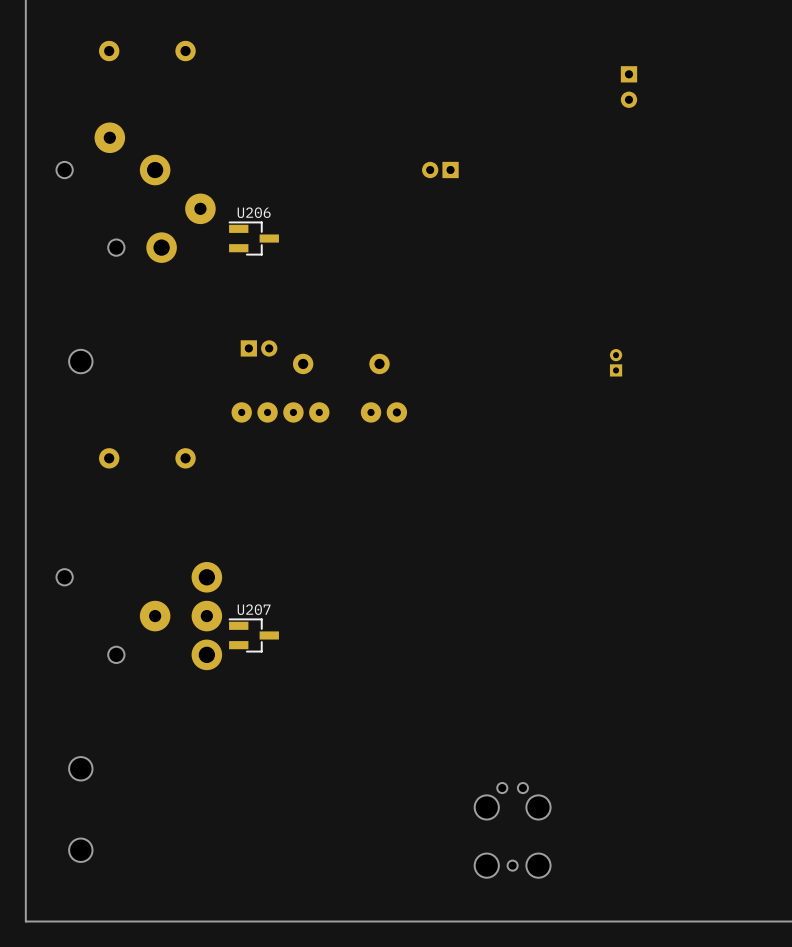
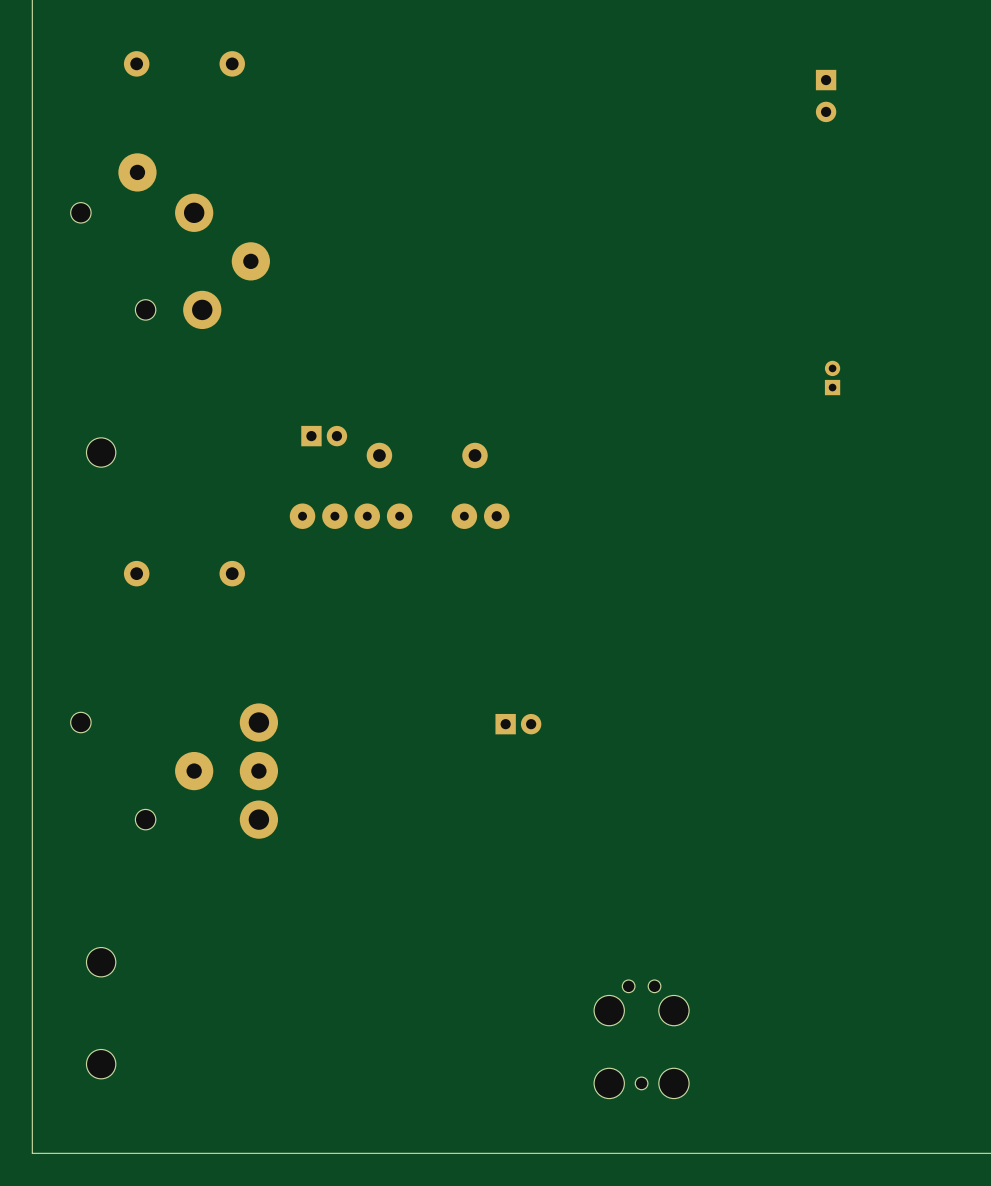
part position: (628, 87) -> (826, 95)
part: (440, 169) -> none
U206: (253, 238) -> none
part position: (616, 362) -> (832, 377)
part: none -> (518, 724)
U207: (253, 635) -> none

